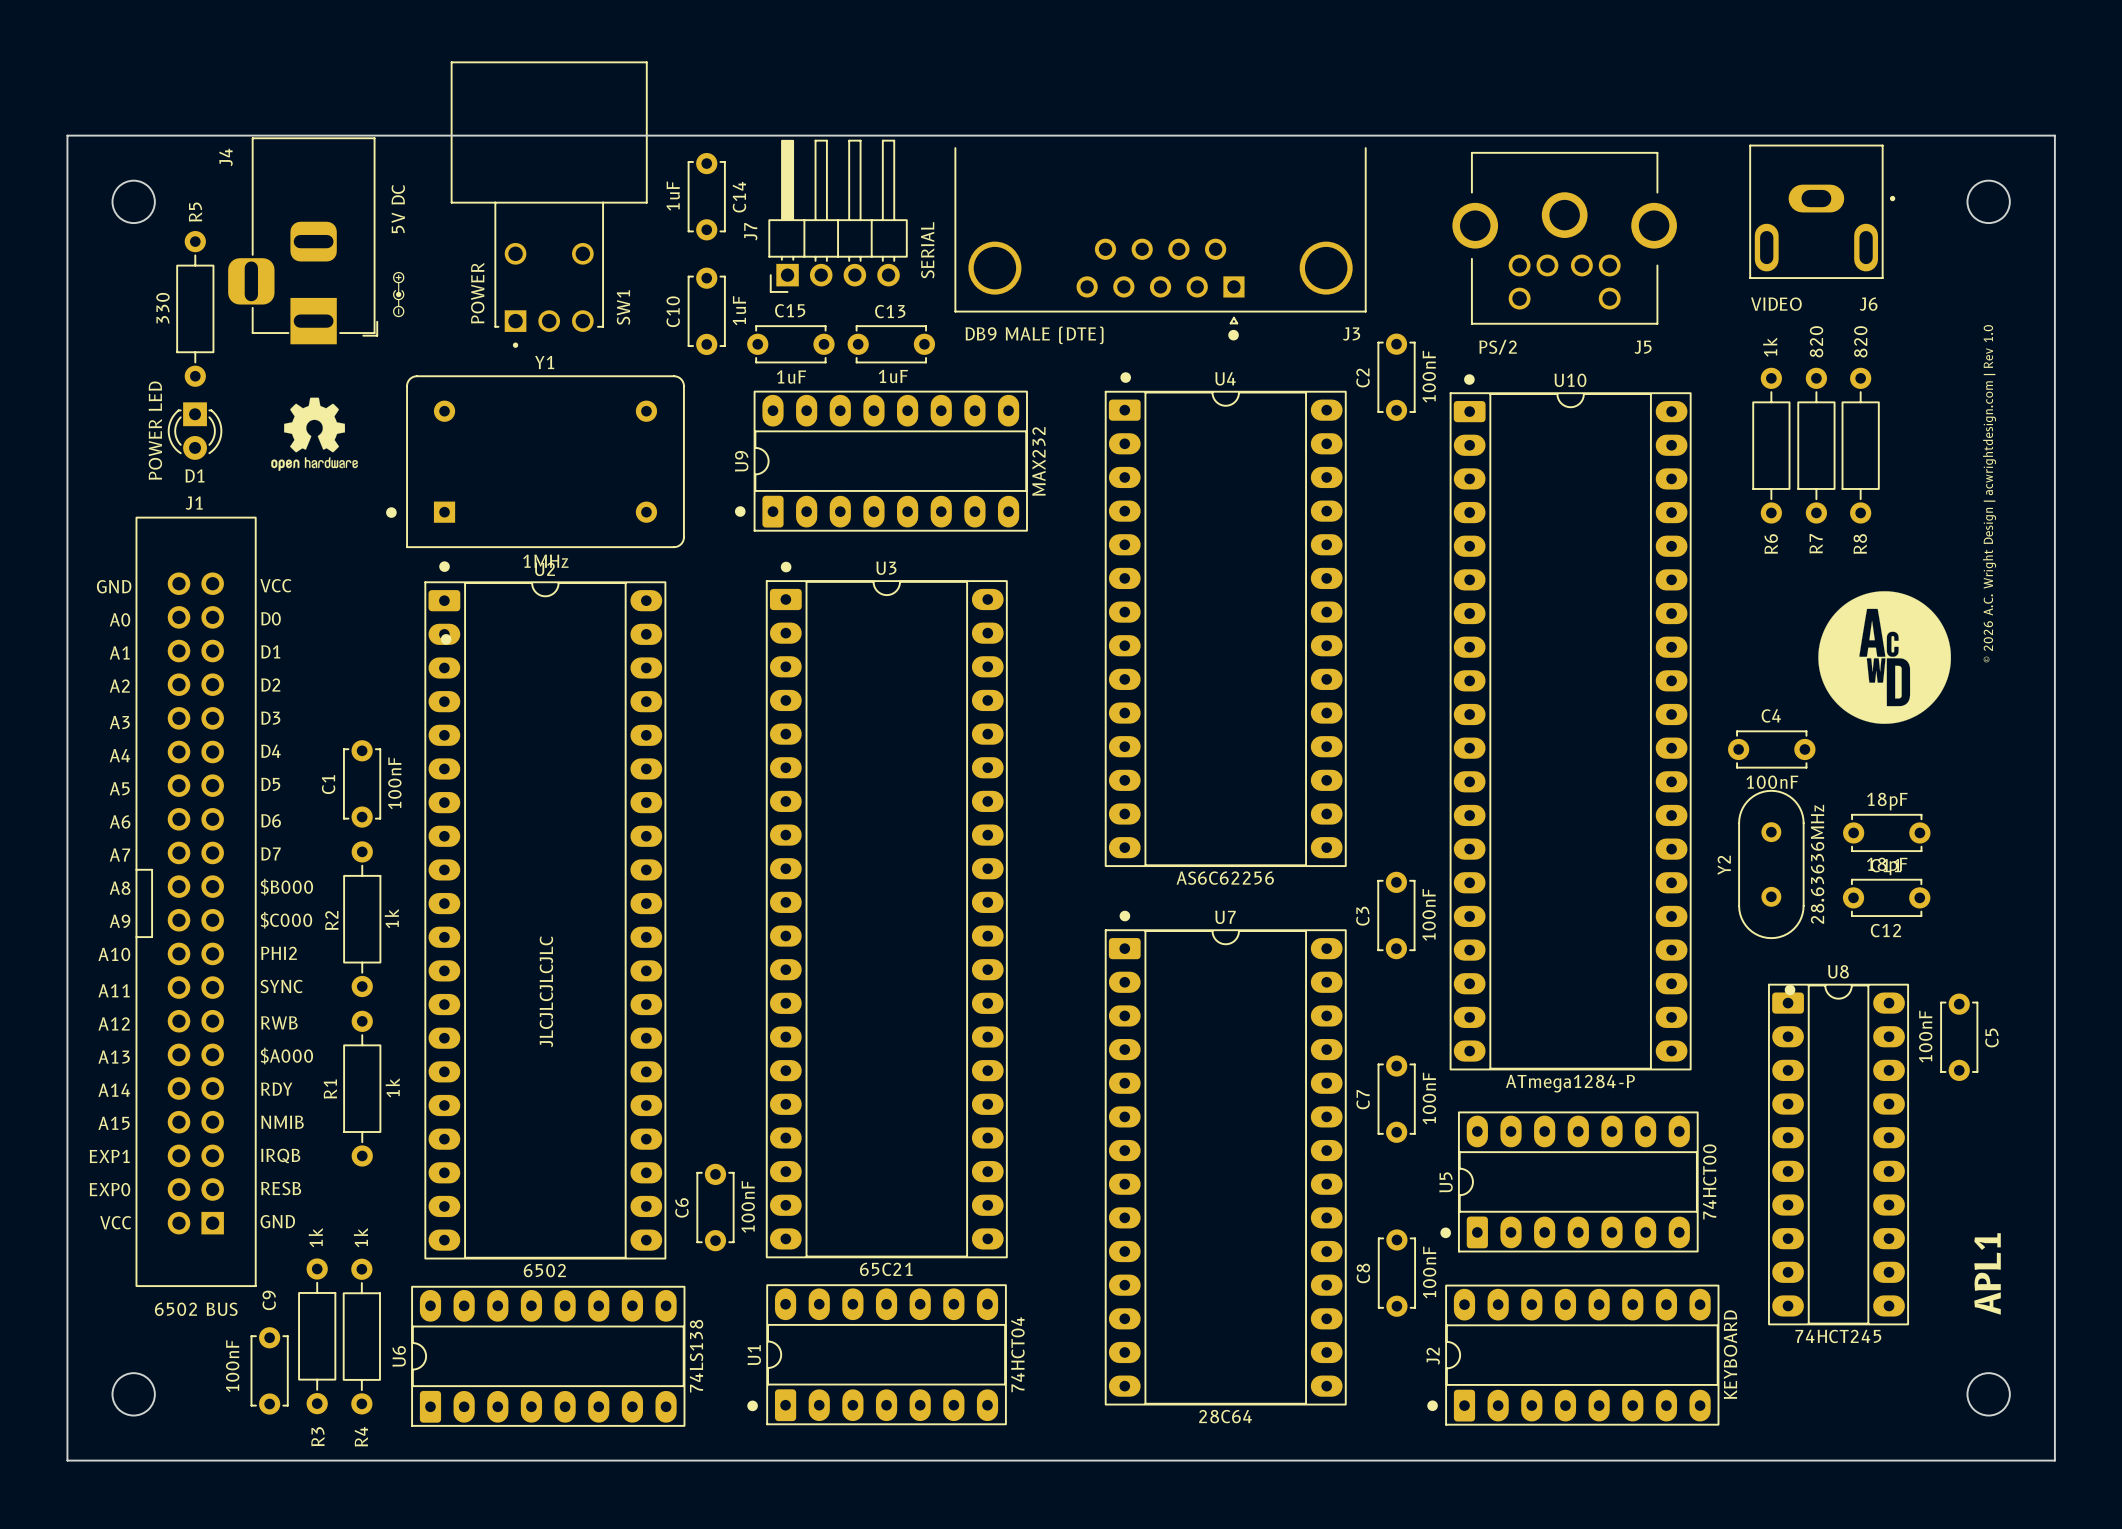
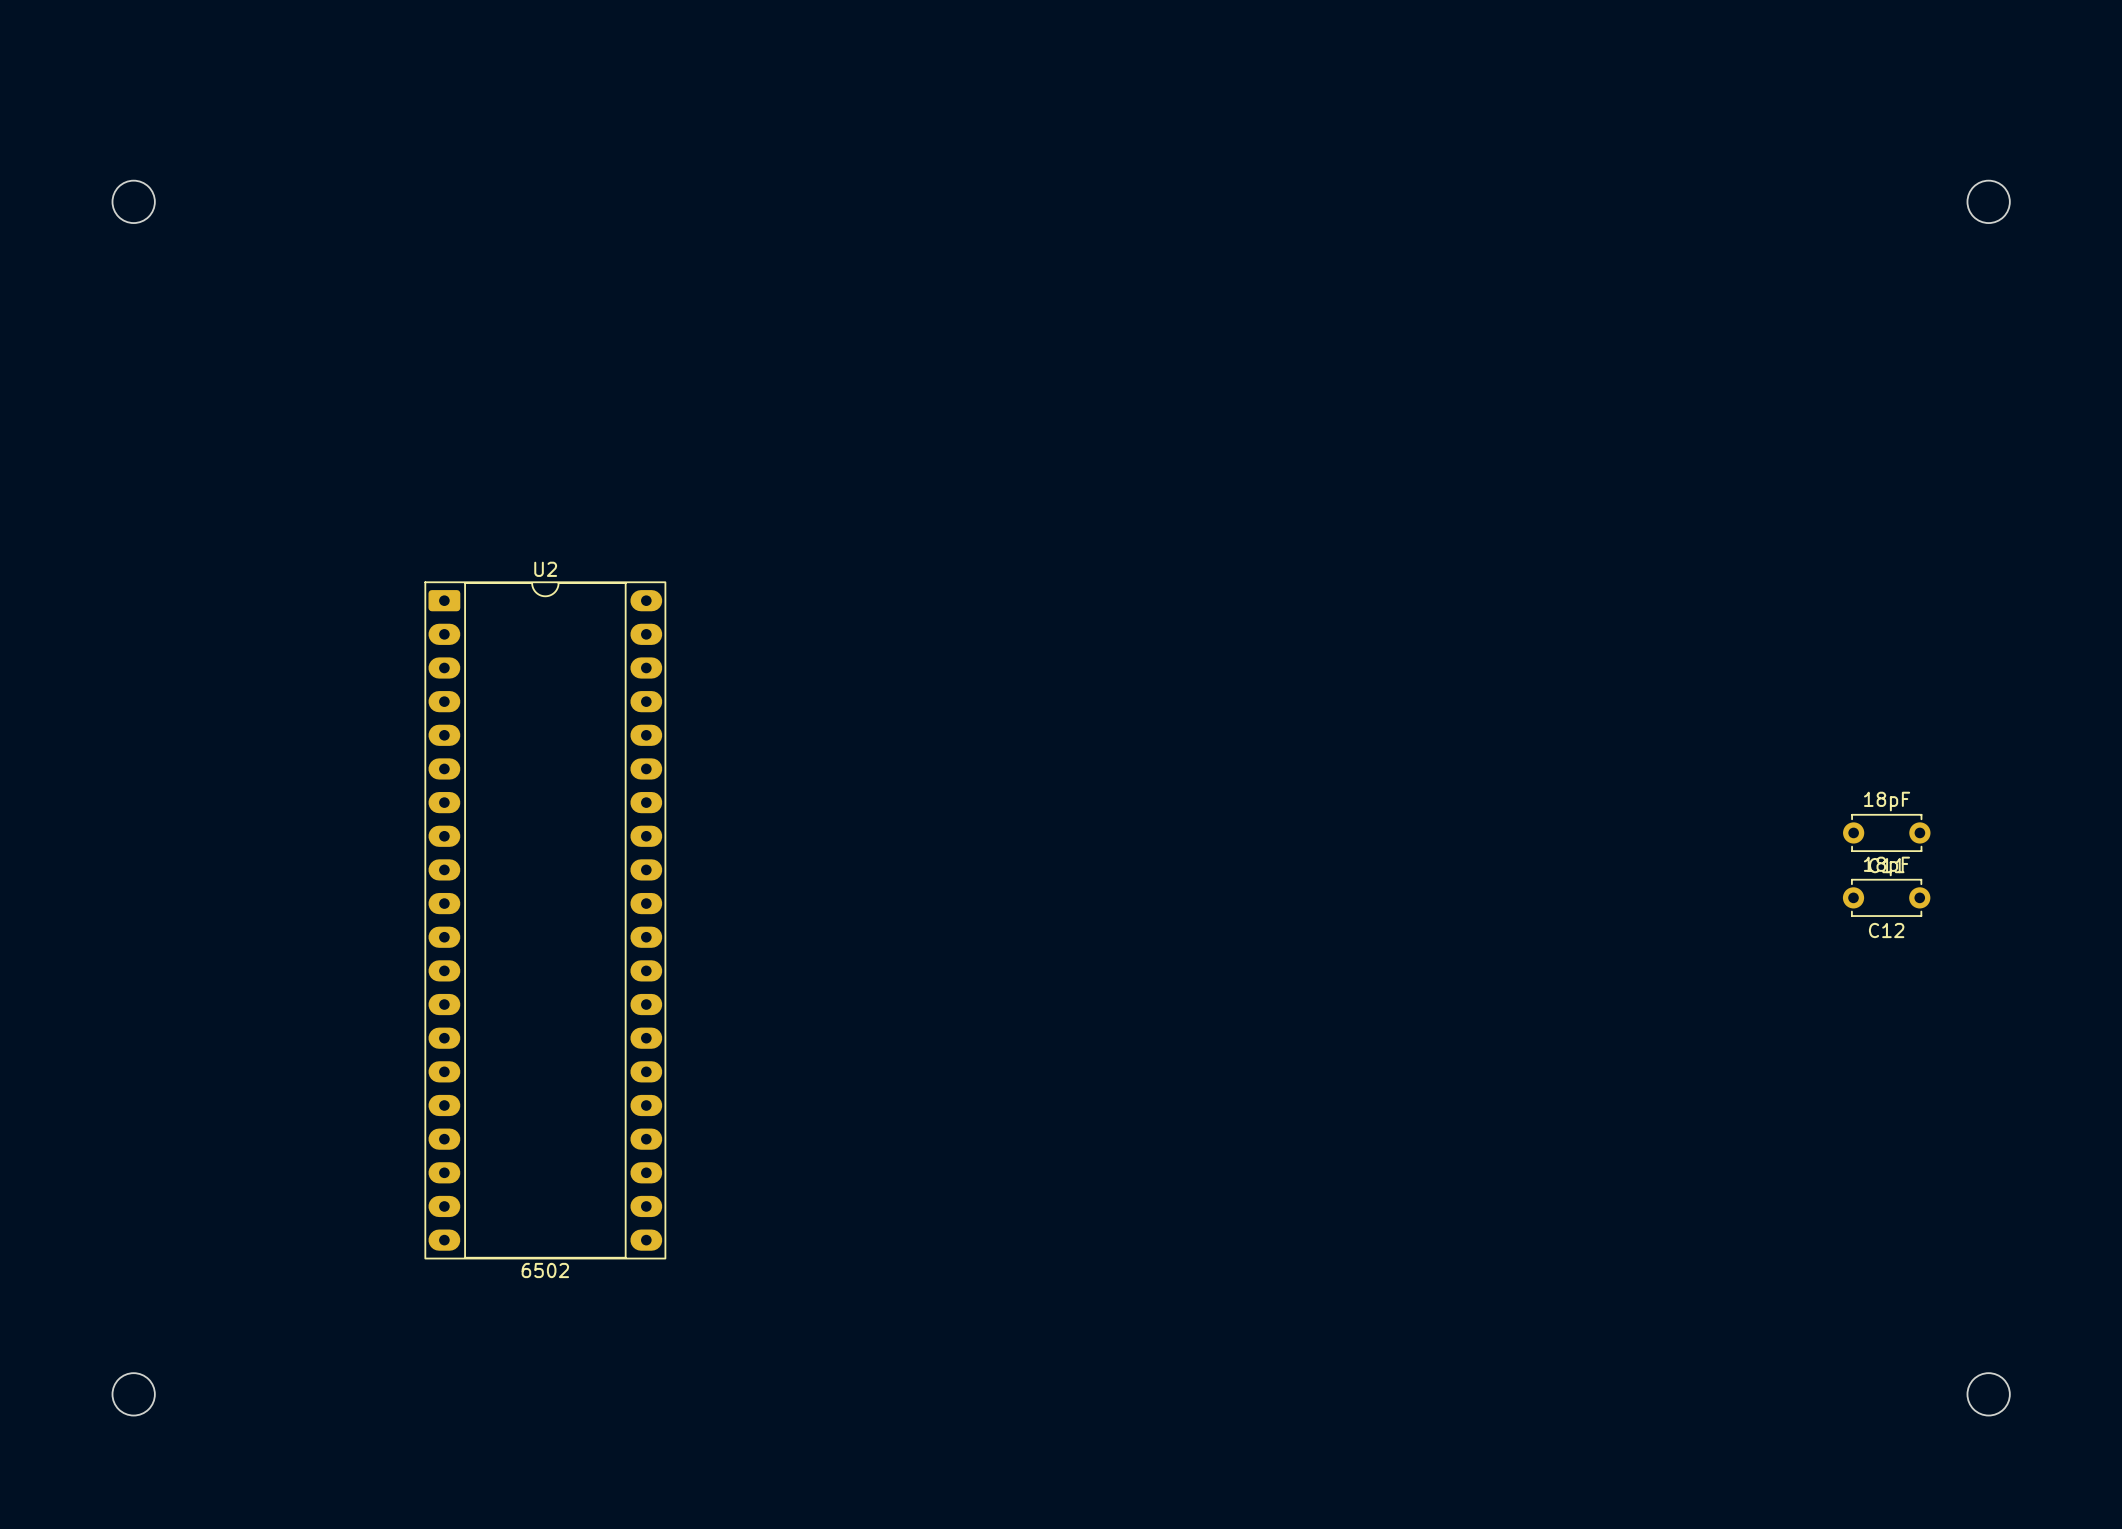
board edge: (67, 135) (2054, 135) (2054, 1460) (67, 1460) (67, 135) -> none
C14: 1uF (706, 196) -> none
SW1: POWER (549, 204) -> none
J6: VIDEO (1822, 211) -> none
J7: SERIAL (838, 216) -> none
J3: DB9 MALE (DTE) (1160, 235) -> none
J5: PS/2 (1564, 238) -> none
J4: 5V DC (303, 240) -> none
drawing: [393, 271, 405, 318] -> none
R5: 330 (195, 308) -> none
C10: 1uF (706, 311) -> none
drawing: [1228, 329, 1239, 341] -> none
C15: 1uF (790, 344) -> none
C13: 1uF (891, 344) -> none
drawing: [1120, 372, 1132, 383] -> none
drawing: [1464, 374, 1475, 385] -> none
C2: 100nF (1396, 377) -> none
drawing: [271, 397, 358, 472] -> none
D1: POWER LED (195, 431) -> none
R6: 1k (1771, 445) -> none
R7: 820 (1816, 445) -> none
R8: 820 (1860, 445) -> none
Y1: 1MHz (545, 461) -> none
U9: MAX232 (890, 461) -> none
text: © 2026 A.C. Wright Design | acwrightdesign.com | Rev 1.0 (1989, 493) -> none
drawing: [734, 506, 746, 517] -> none
drawing: [386, 507, 397, 518] -> none
drawing: [439, 561, 450, 572] -> none
drawing: [780, 561, 792, 573] -> none
text: VCC (275, 585) -> none
text: GND (114, 586) -> none
drawing: [1818, 591, 1951, 724] -> none
text: D0 (271, 618) -> none
text: A0 (119, 619) -> none
U4: AS6C62256 (1225, 628) -> none
drawing: [440, 634, 452, 645] -> none
text: D1 (270, 651) -> none
text: A1 (119, 652) -> none
text: D2 (270, 685) -> none
text: A2 (119, 686) -> none
text: D3 (270, 718) -> none
text: A3 (119, 722) -> none
U10: ATmega1284-P (1570, 731) -> none
C4: 100nF (1771, 749) -> none
text: D4 (270, 751) -> none
text: A4 (119, 755) -> none
C1: 100nF (362, 783) -> none
text: D5 (270, 784) -> none
text: A5 (119, 788) -> none
text: D6 (271, 820) -> none
text: A6 (120, 821) -> none
text: D7 (270, 853) -> none
text: A7 (119, 854) -> none
Y2: 28.63636MHz (1771, 864) -> none
text: $B000 (286, 887) -> none
text: A8 (120, 888) -> none
J1: 6502 BUS (196, 901) -> none
drawing: [1119, 910, 1131, 922] -> none
C3: 100nF (1396, 915) -> none
R2: 1k (362, 919) -> none
U3: 65C21 (886, 919) -> none
text: $C000 (286, 920) -> none
text: A9 (120, 921) -> none
text: PHI2 (279, 953) -> none
text: A10 (114, 954) -> none
drawing: [1784, 984, 1796, 996] -> none
text: SYNC (281, 986) -> none
text: A11 (114, 990) -> none
text: JLCJLCJLCJLC (546, 991) -> none
text: RWB (279, 1022) -> none
text: A12 (114, 1023) -> none
C5: 100nF (1959, 1037) -> none
text: $A000 (286, 1055) -> none
text: A13 (114, 1057) -> none
R1: 1k (362, 1088) -> none
text: RDY (276, 1089) -> none
text: A14 (114, 1090) -> none
C7: 100nF (1396, 1099) -> none
text: NMIB (282, 1122) -> none
text: A15 (114, 1123) -> none
U8: 74HCT245 (1838, 1154) -> none
text: IRQB (280, 1155) -> none
text: EXP1 (109, 1156) -> none
U7: 28C64 (1225, 1167) -> none
U5: 74HCT00 (1578, 1181) -> none
text: RESB (281, 1188) -> none
text: EXP0 (109, 1189) -> none
C6: 100nF (715, 1207) -> none
text: GND (277, 1221) -> none
text: VCC (115, 1222) -> none
drawing: [1440, 1227, 1451, 1239] -> none
C8: 100nF (1396, 1273) -> none
text: APL1 (1987, 1273) -> none
R3: 1k (317, 1336) -> none
R4: 1k (361, 1336) -> none
U1: 74HCT04 (886, 1354) -> none
J2: KEYBOARD (1582, 1355) -> none
U6: 74LS138 (548, 1356) -> none
C9: 100nF (269, 1370) -> none
drawing: [747, 1400, 758, 1412] -> none
drawing: [1427, 1400, 1438, 1412] -> none

